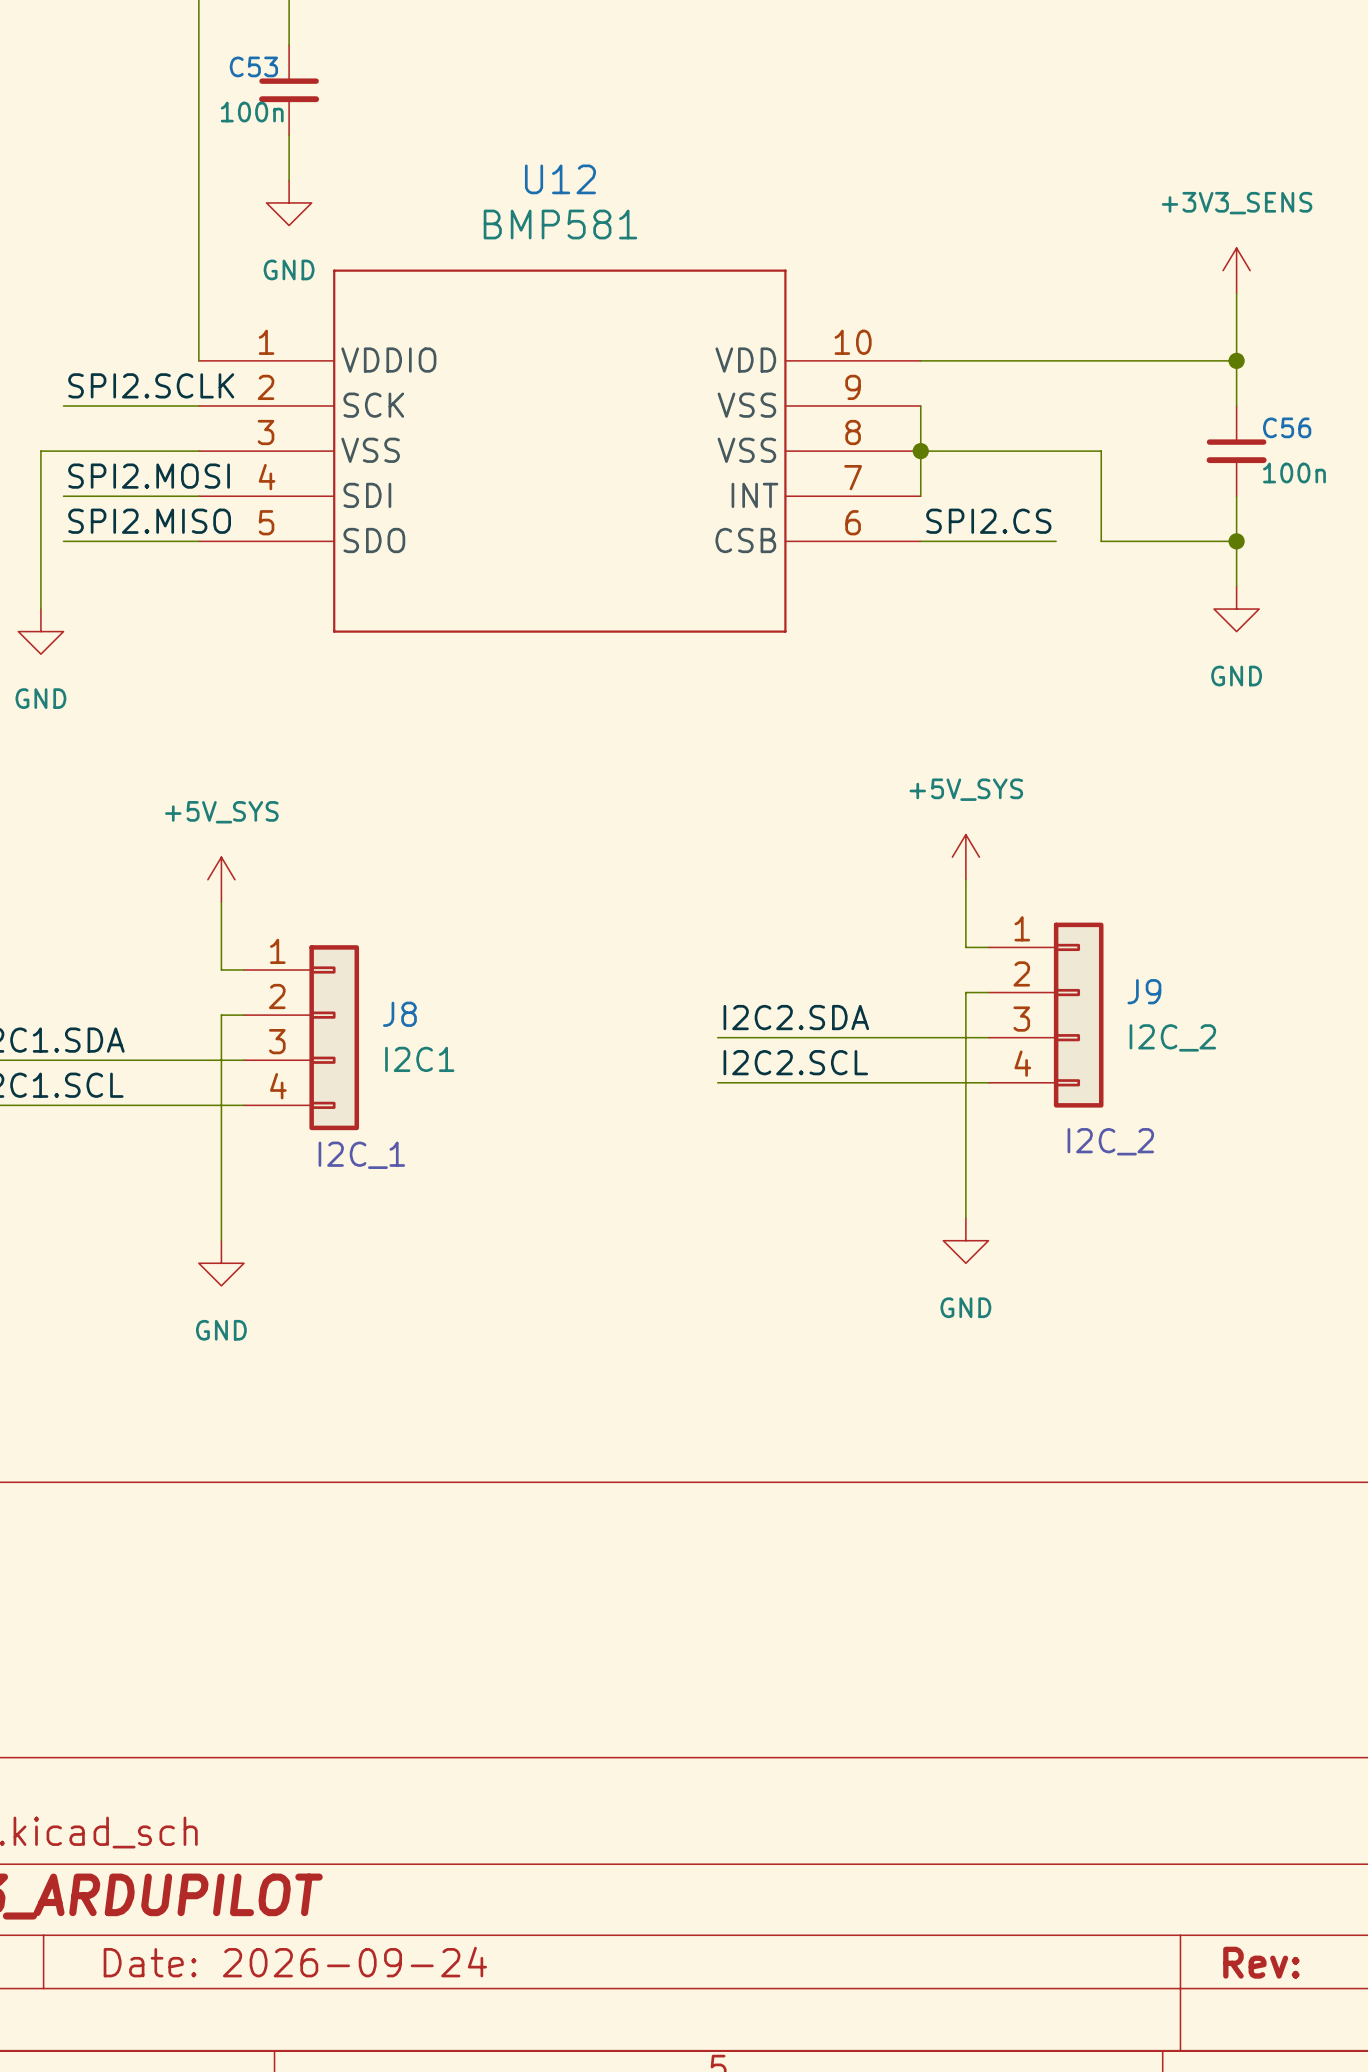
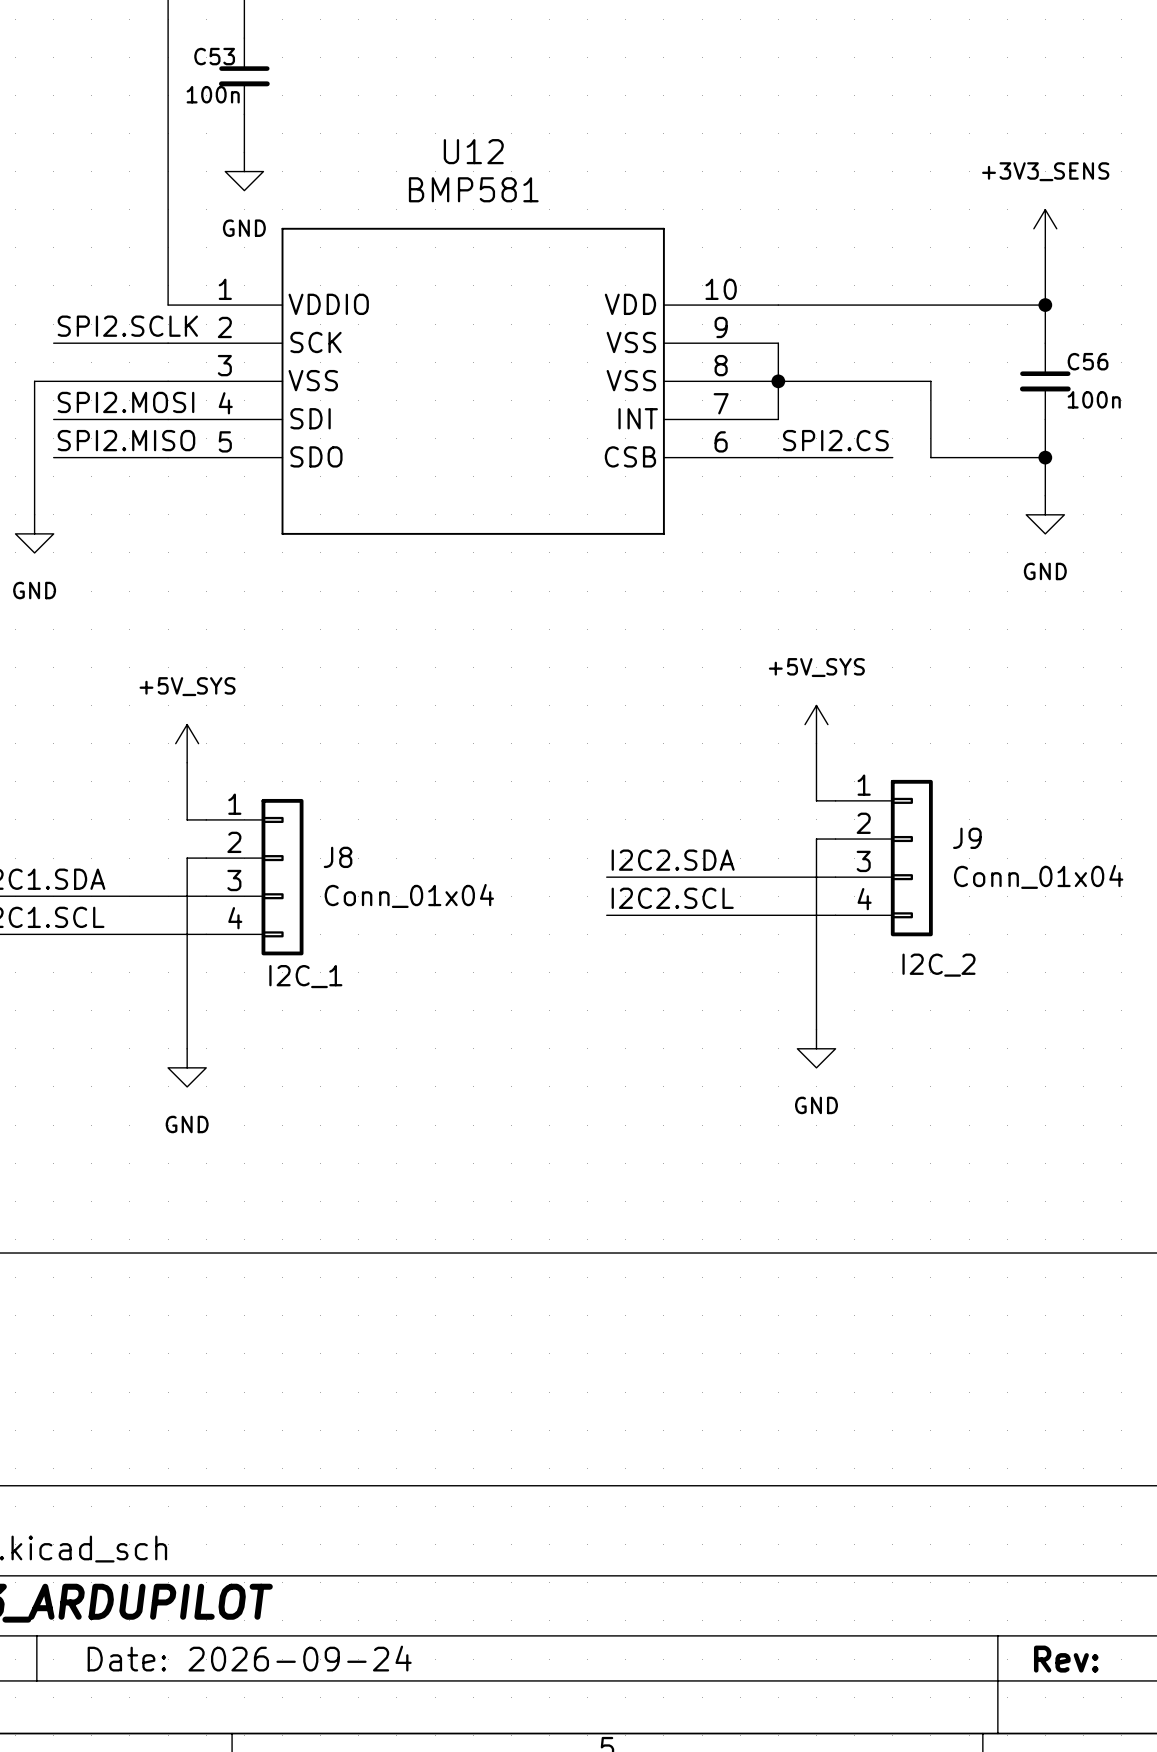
J9 value: I2C_2 (1172, 1037) -> Conn_01x04 (1038, 876)
J8 value: I2C1 (419, 1059) -> Conn_01x04 (409, 895)

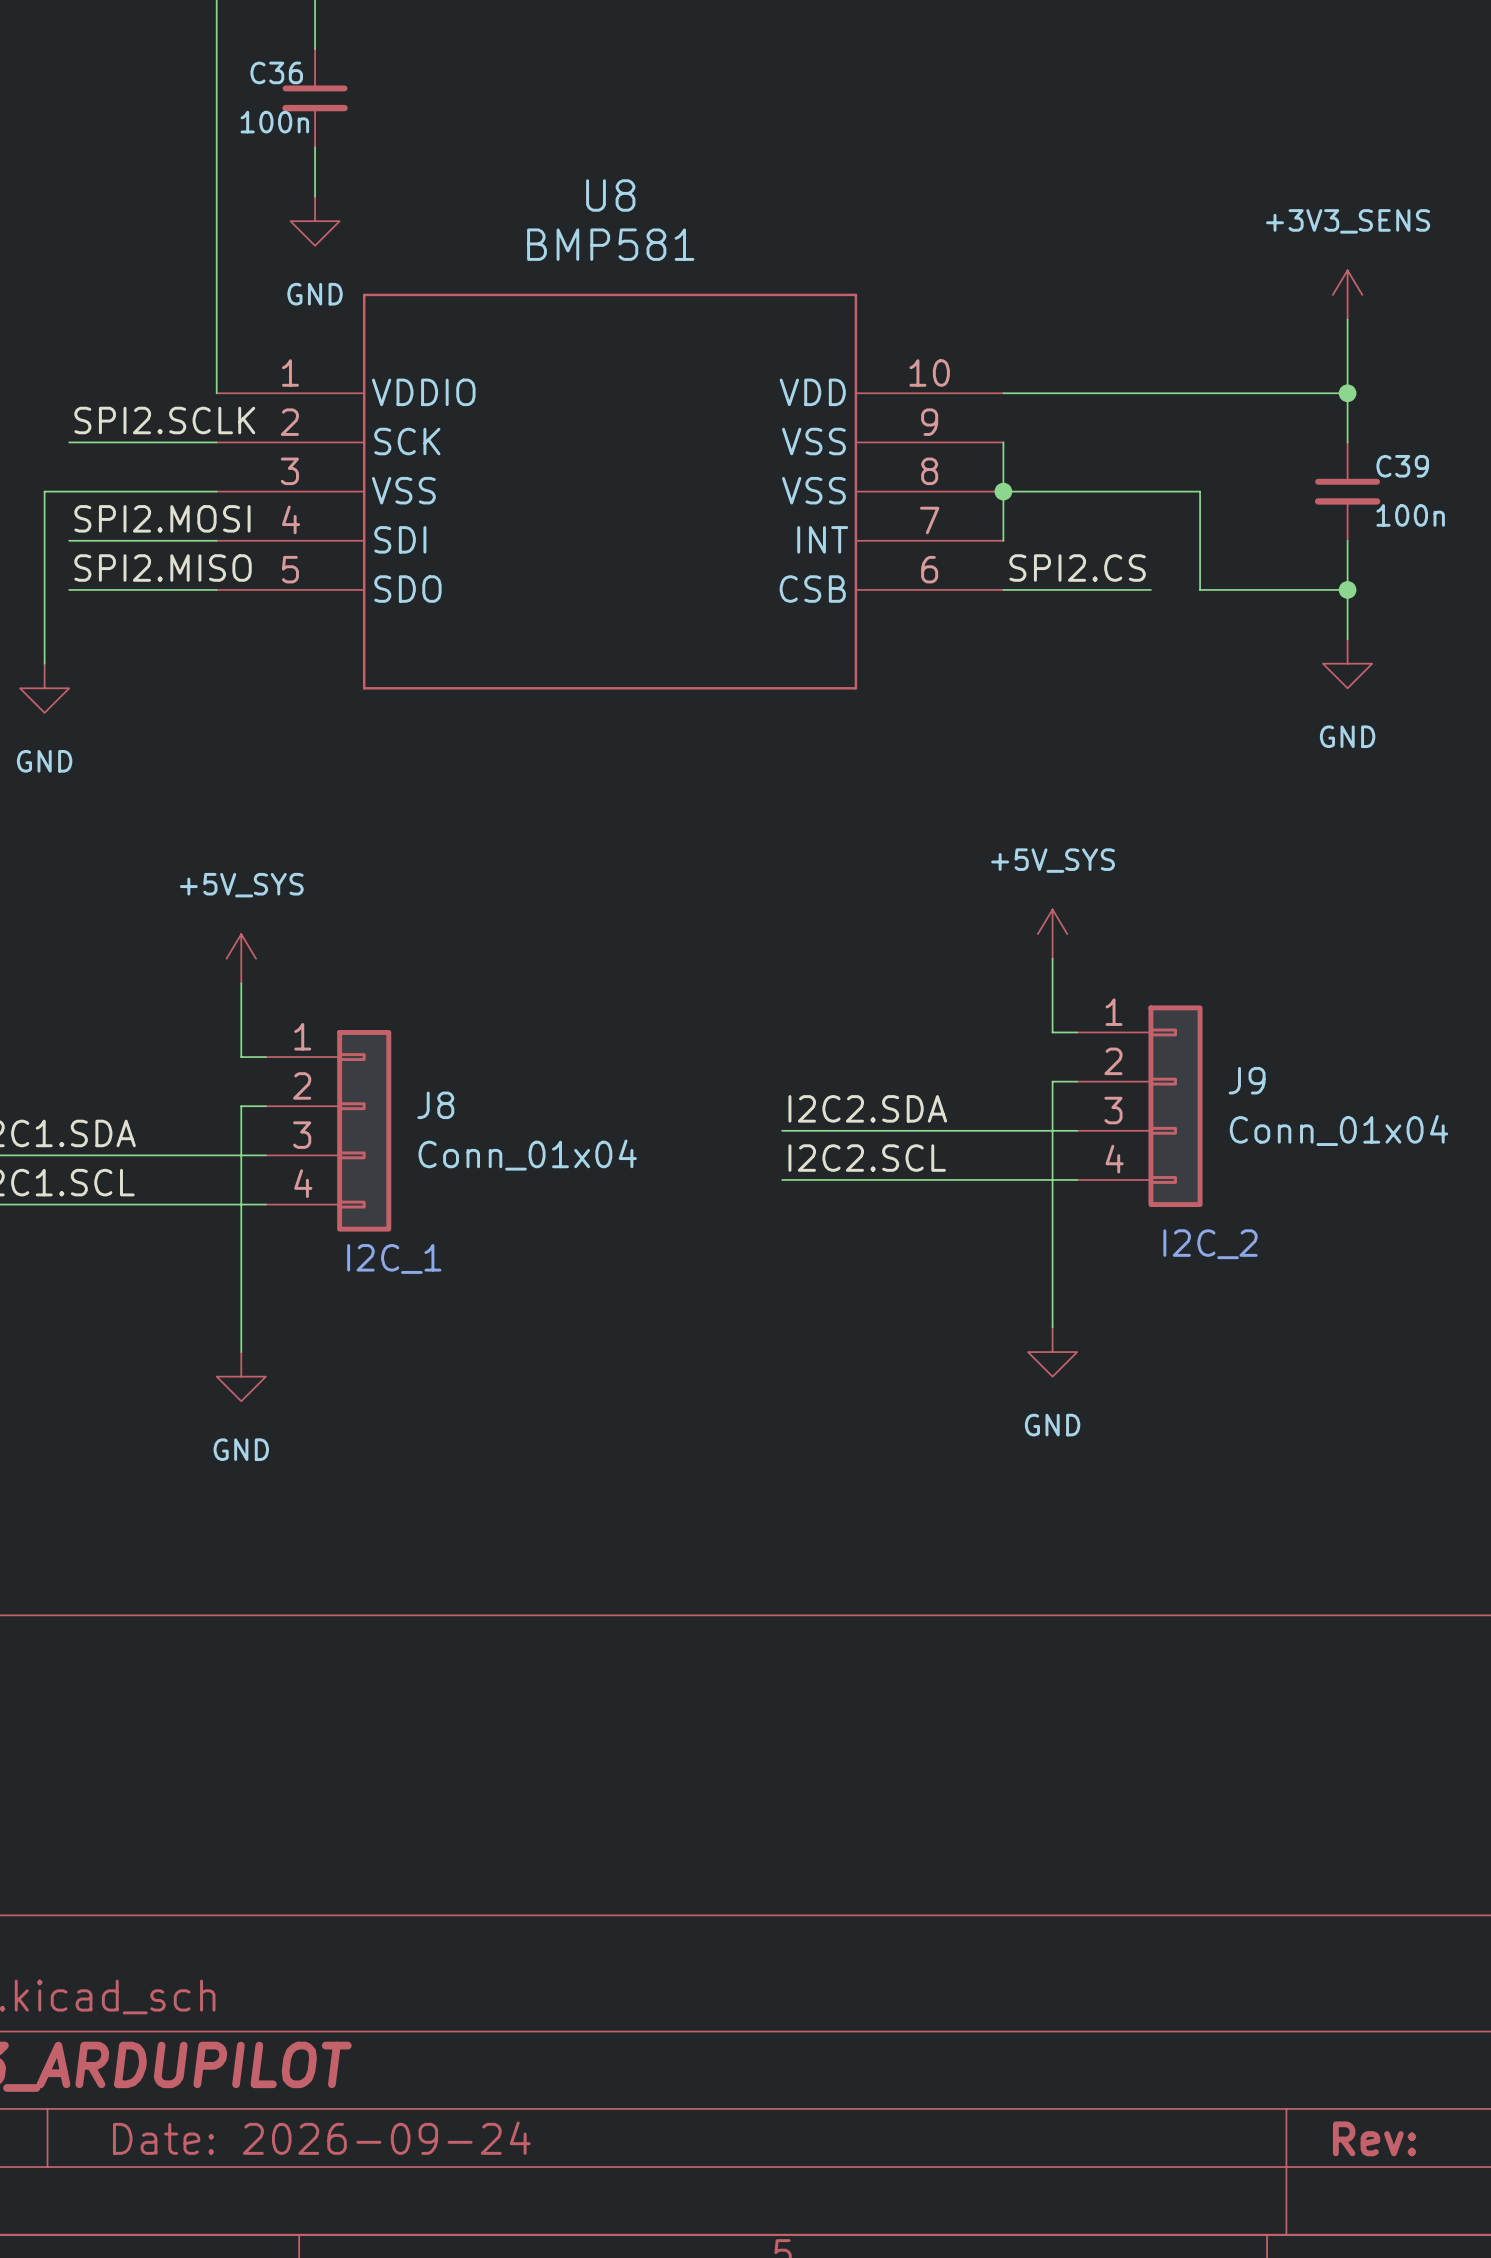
C53 name: C53 (214, 56) -> C36 (276, 72)
U12 name: U12 (473, 151) -> U8 (610, 195)
C56 name: C56 (1088, 361) -> C39 (1402, 466)

